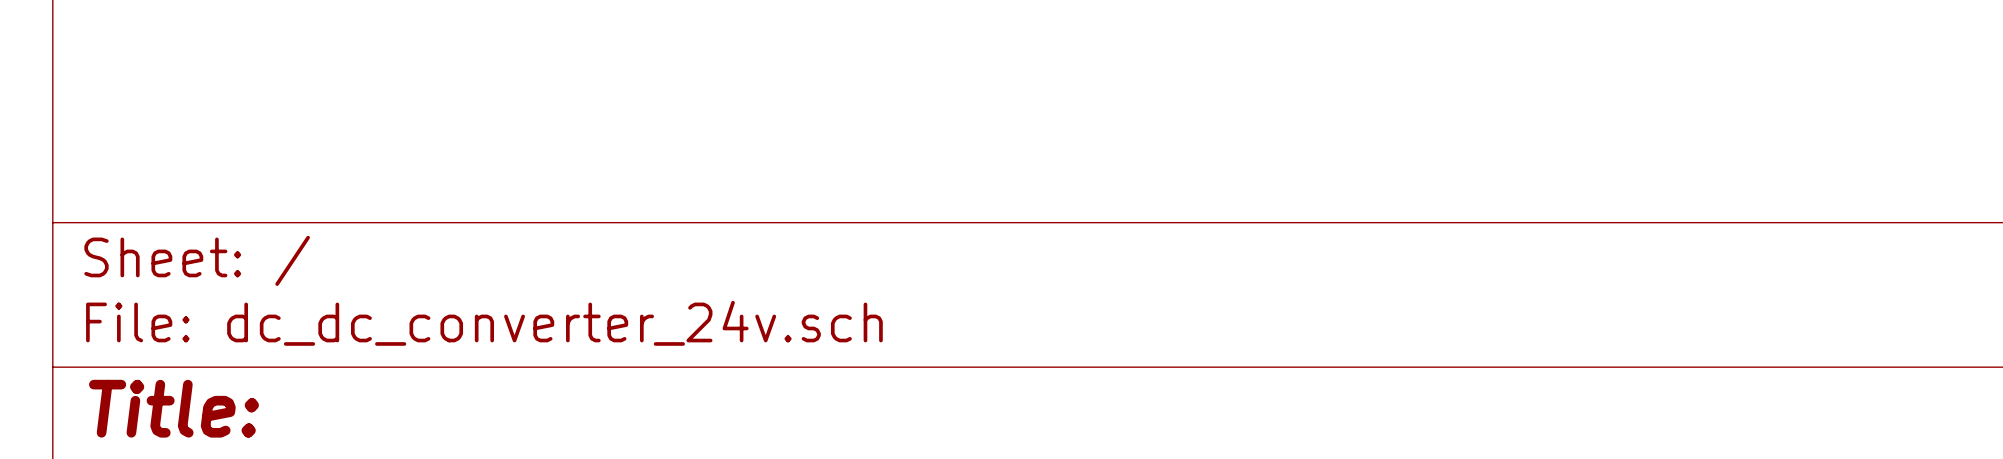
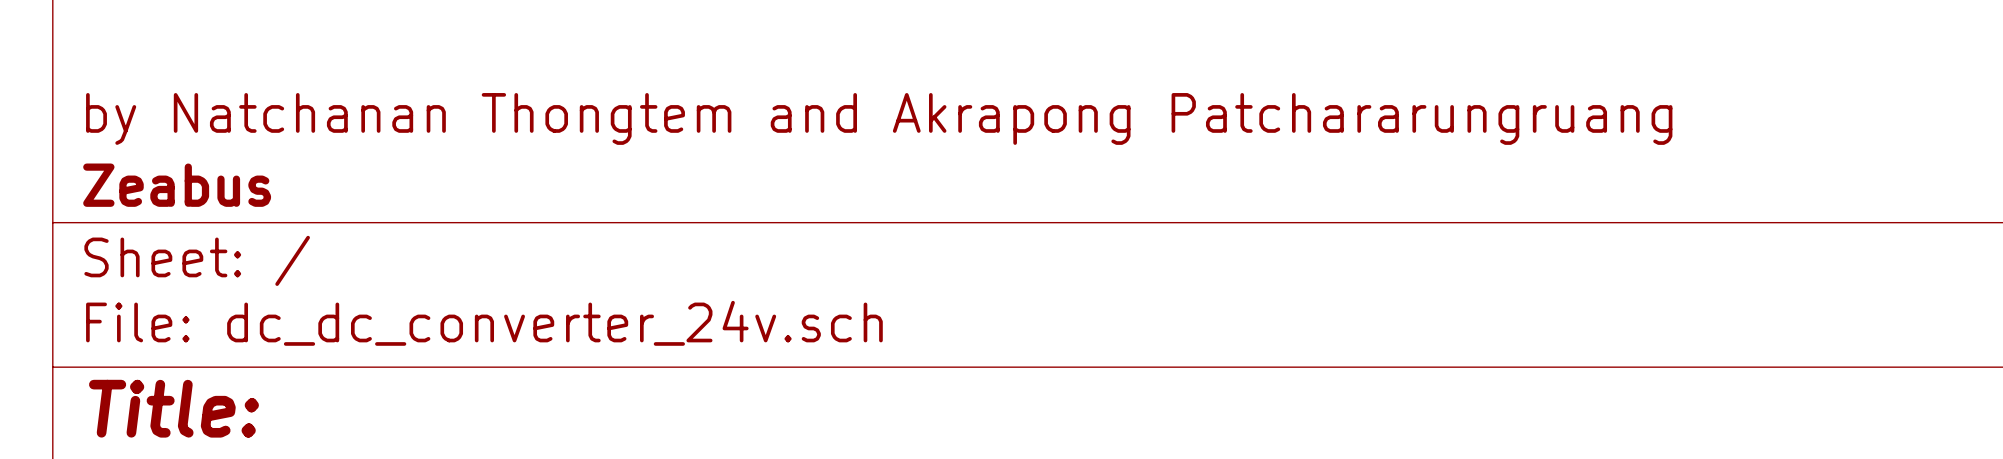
title block: none -> by Natchanan Thongtem and Akrapong Patchararungruang (879, 118)
title block: none -> Zeabus (177, 185)

